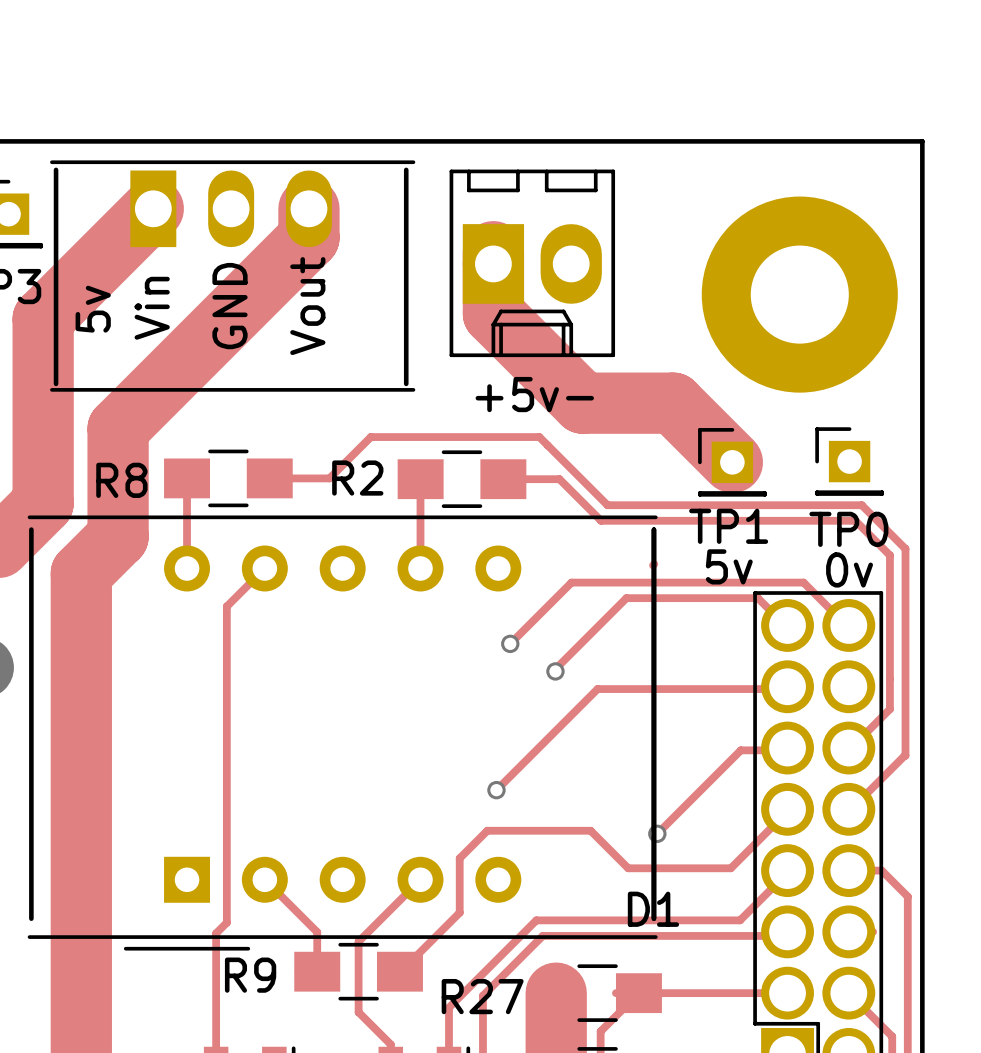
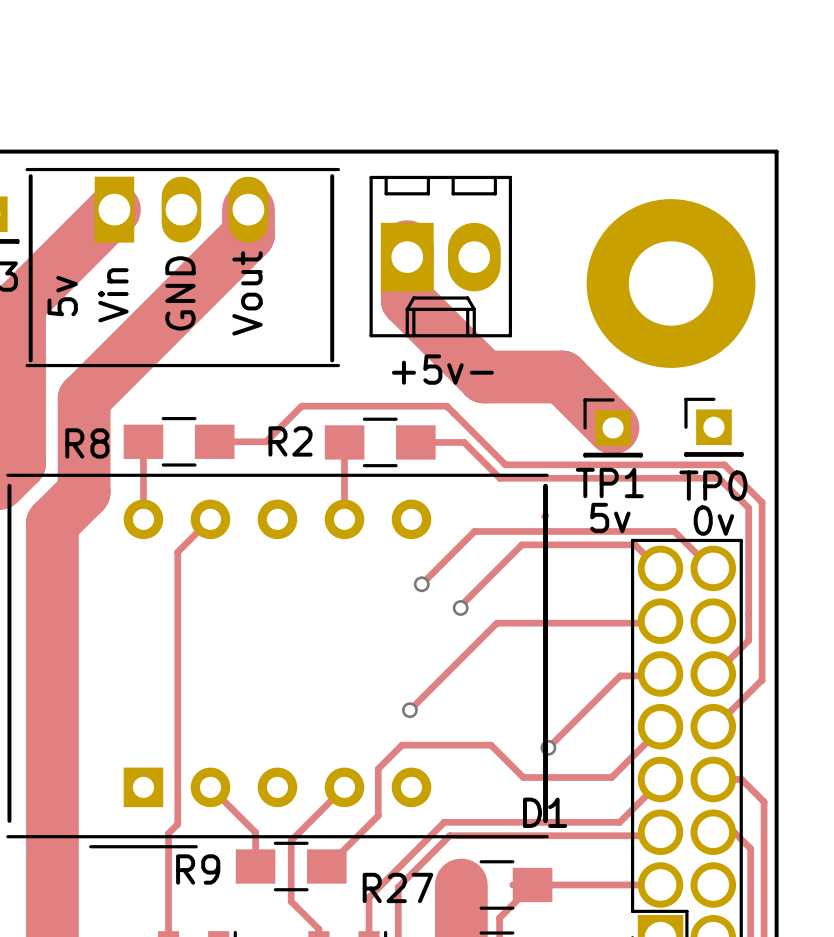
track: (848, 993) (892, 1036) -> (734, 832) (750, 848) (750, 922)

